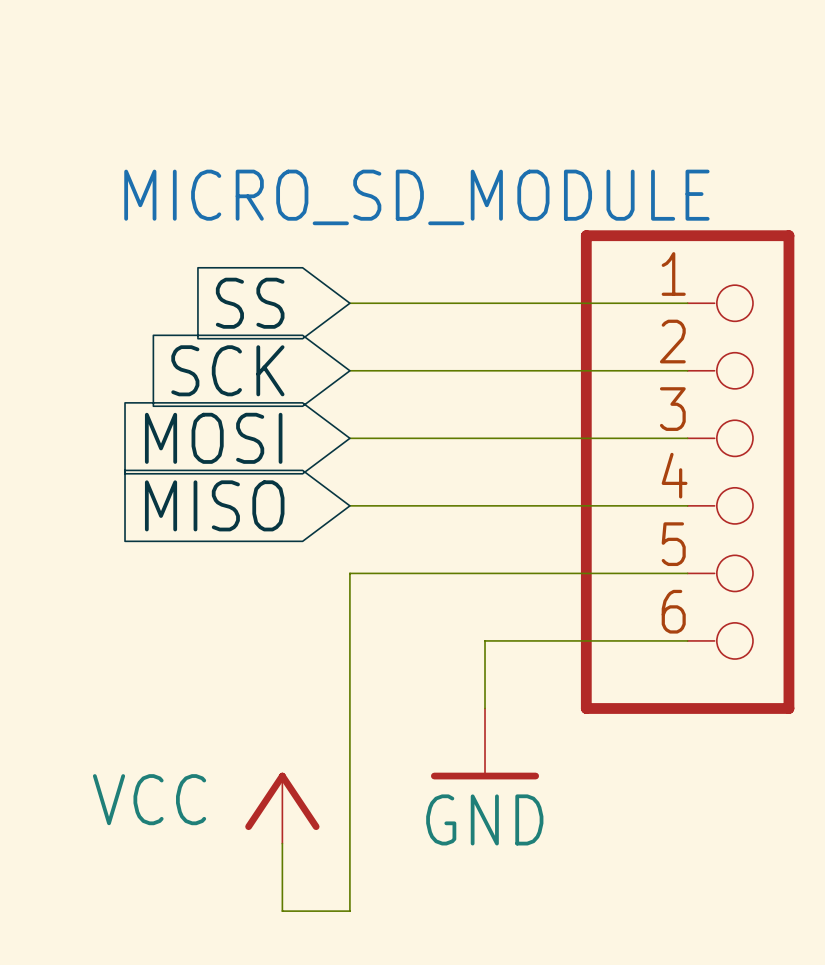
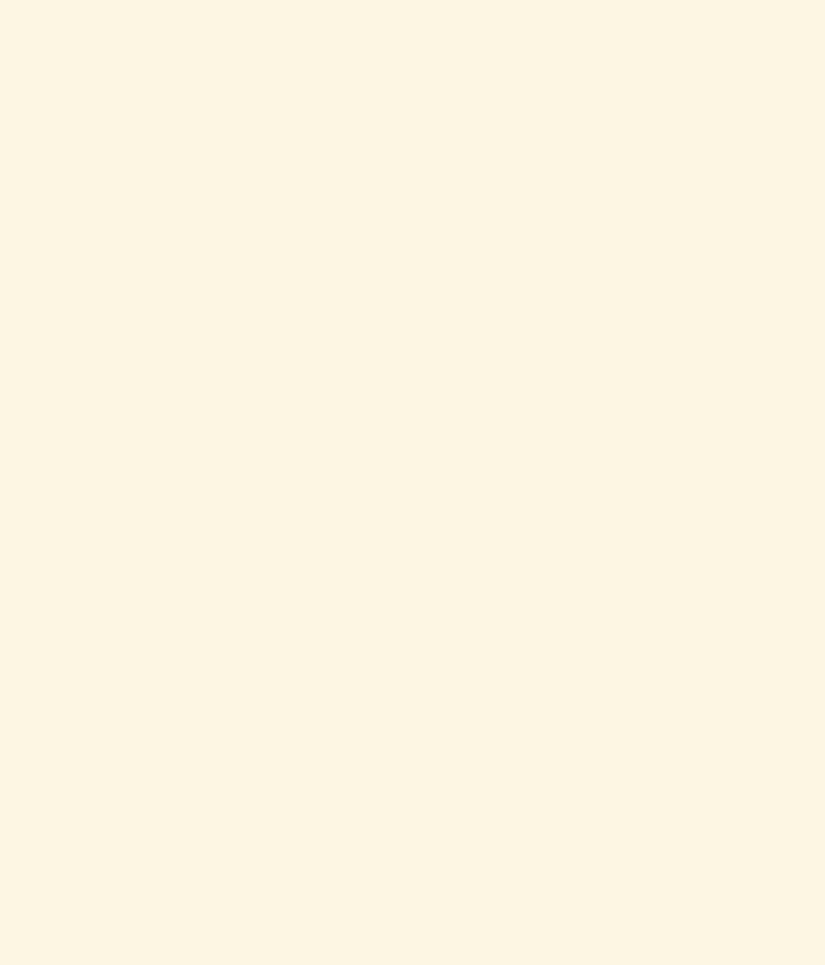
global label: SS (250, 303) -> none
wire: (349, 303) (687, 303) -> none
global label: SCK (227, 370) -> none
wire: (349, 370) (687, 370) -> none
global label: MOSI (213, 438) -> none
wire: (349, 438) (687, 438) -> none
MICRO_SD_MODULE: (687, 472) -> none
global label: MISO (214, 505) -> none
wire: (349, 505) (687, 505) -> none
wire: (687, 573) (349, 573) (349, 911) (282, 911) (282, 843) -> none
wire: (687, 640) (485, 640) (485, 708) -> none
power symbol: GND (485, 743) -> none
power symbol: VCC (282, 808) -> none

